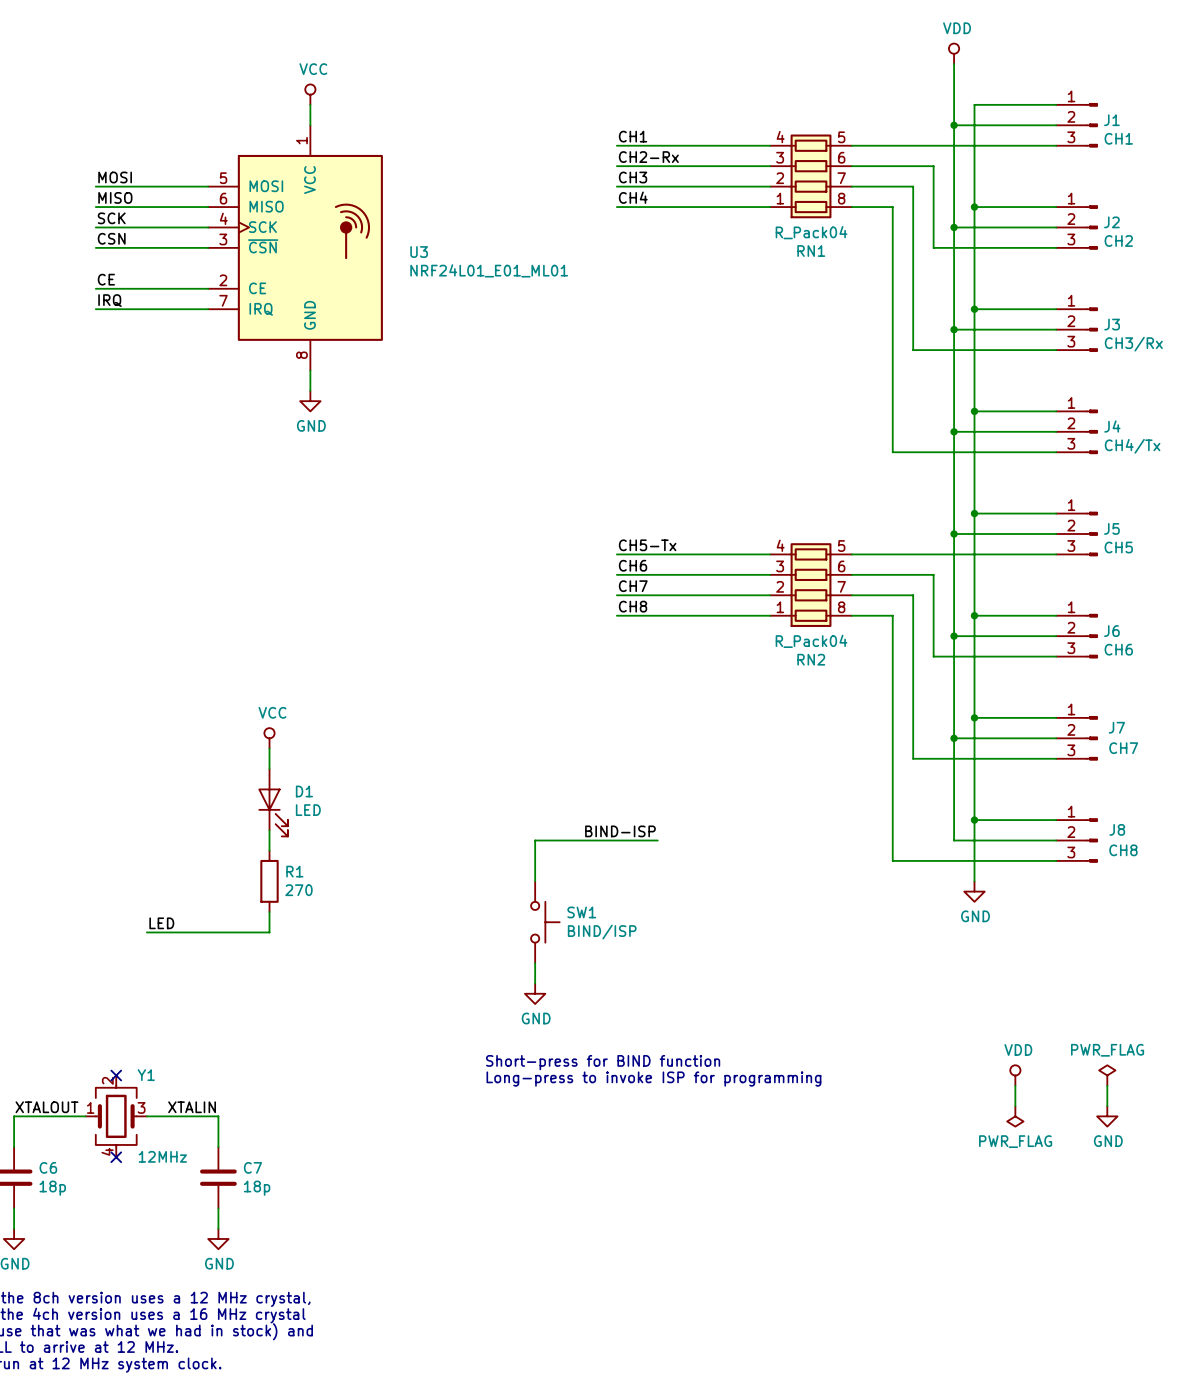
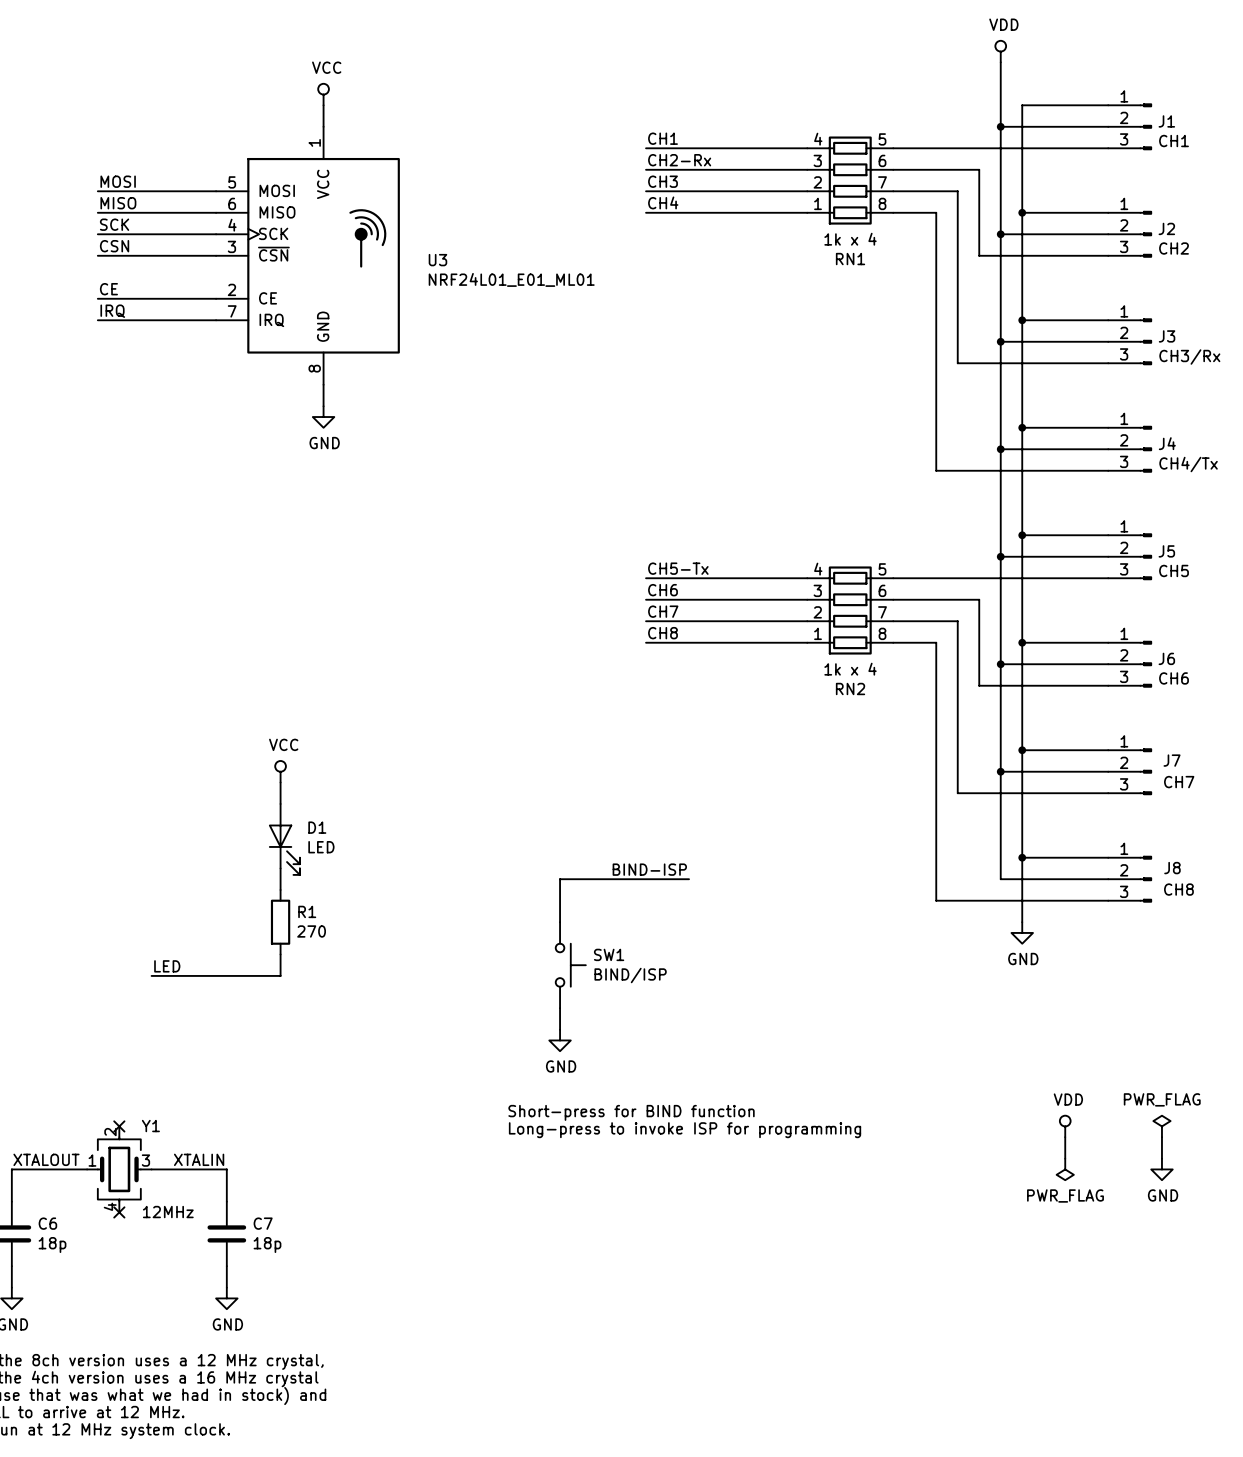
RN1 value: R_Pack04 (811, 232) -> 1k x 4 (850, 239)
RN2 value: R_Pack04 (811, 641) -> 1k x 4 (850, 669)

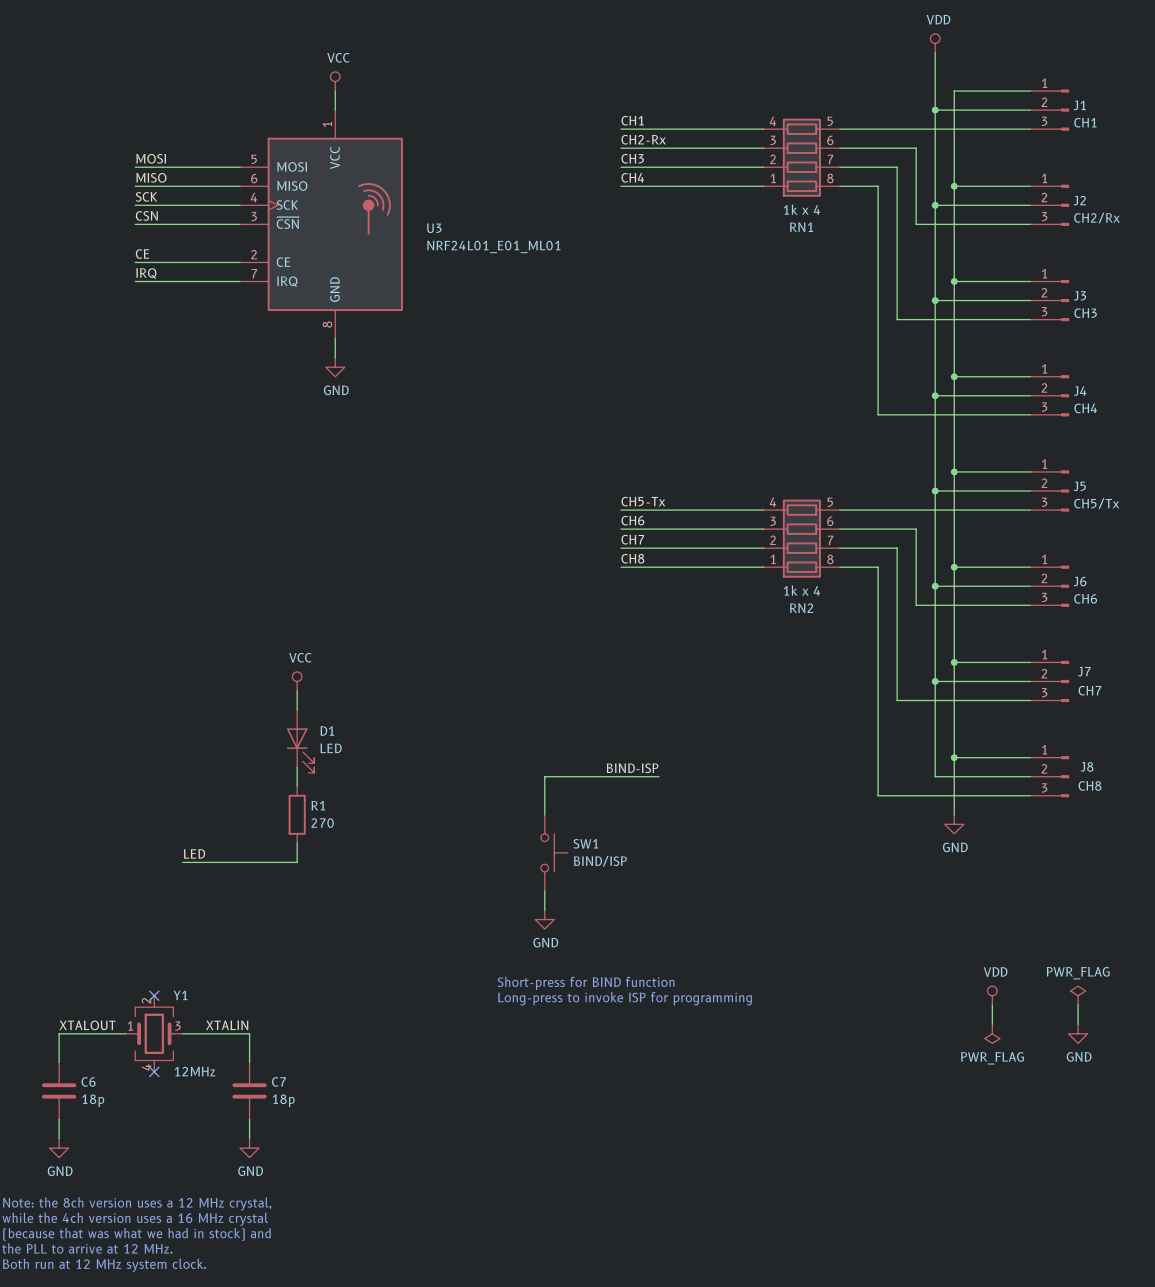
J2 value: CH2 (1174, 248) -> CH2/Rx (1097, 217)
J3 value: CH3/Rx (1189, 357) -> CH3 (1085, 313)
J4 value: CH4/Tx (1188, 464) -> CH4 (1085, 408)
J5 value: CH5 (1174, 570) -> CH5/Tx (1096, 503)

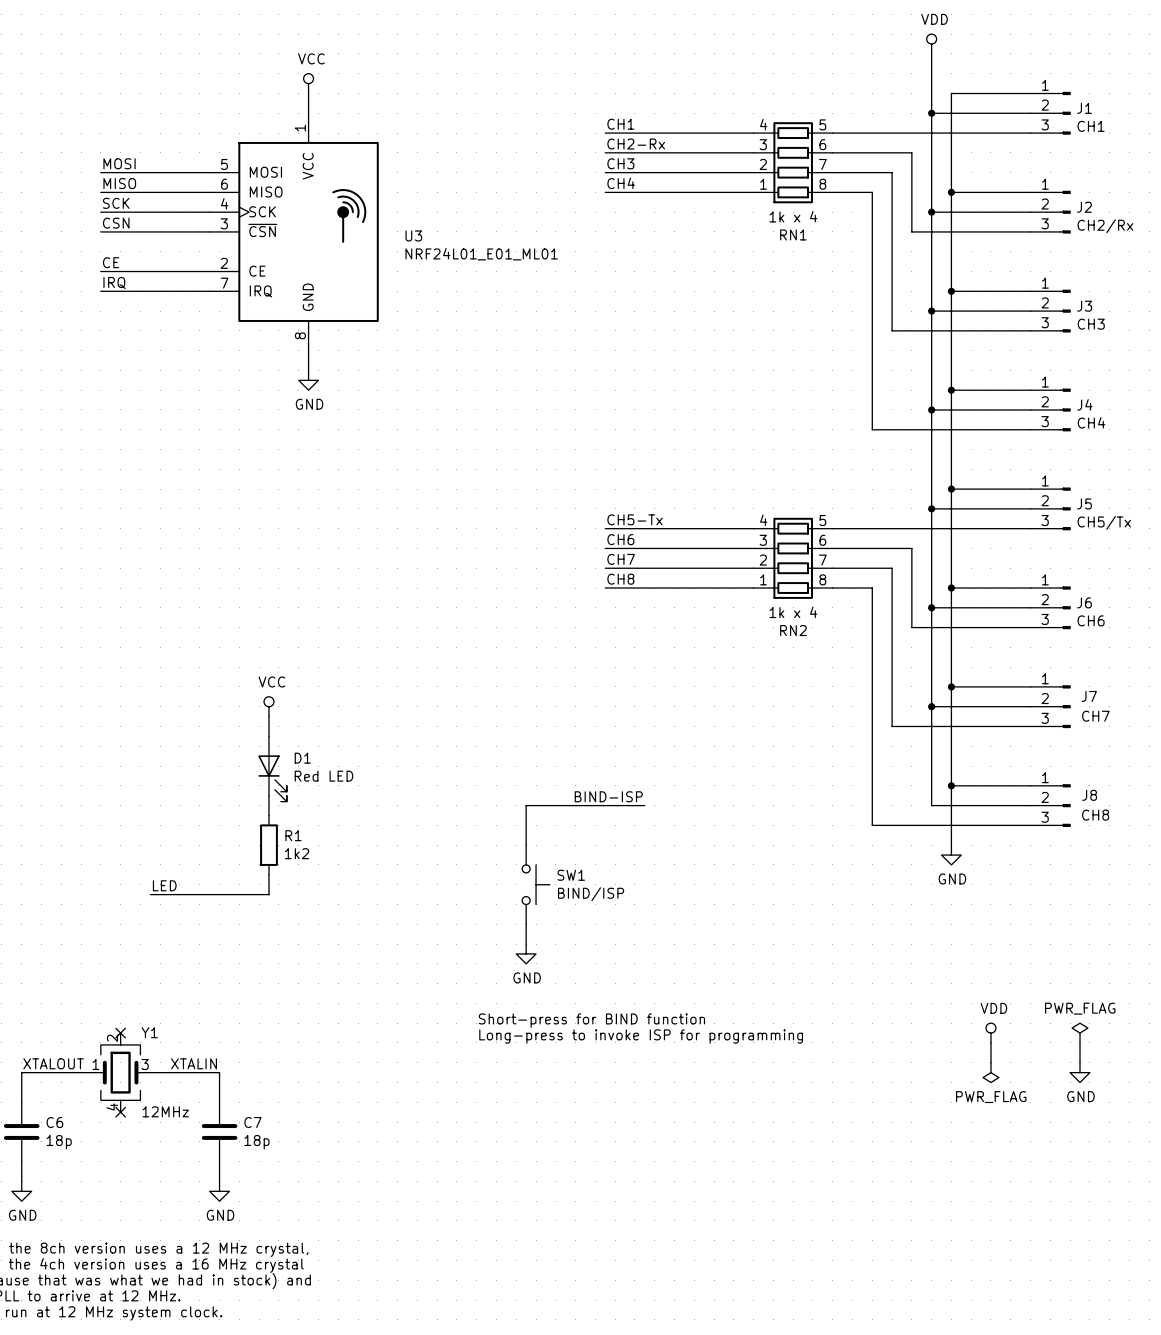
D1 value: LED (331, 748) -> Red LED (324, 776)
R1 value: 270 (322, 823) -> 1k2 (297, 853)

